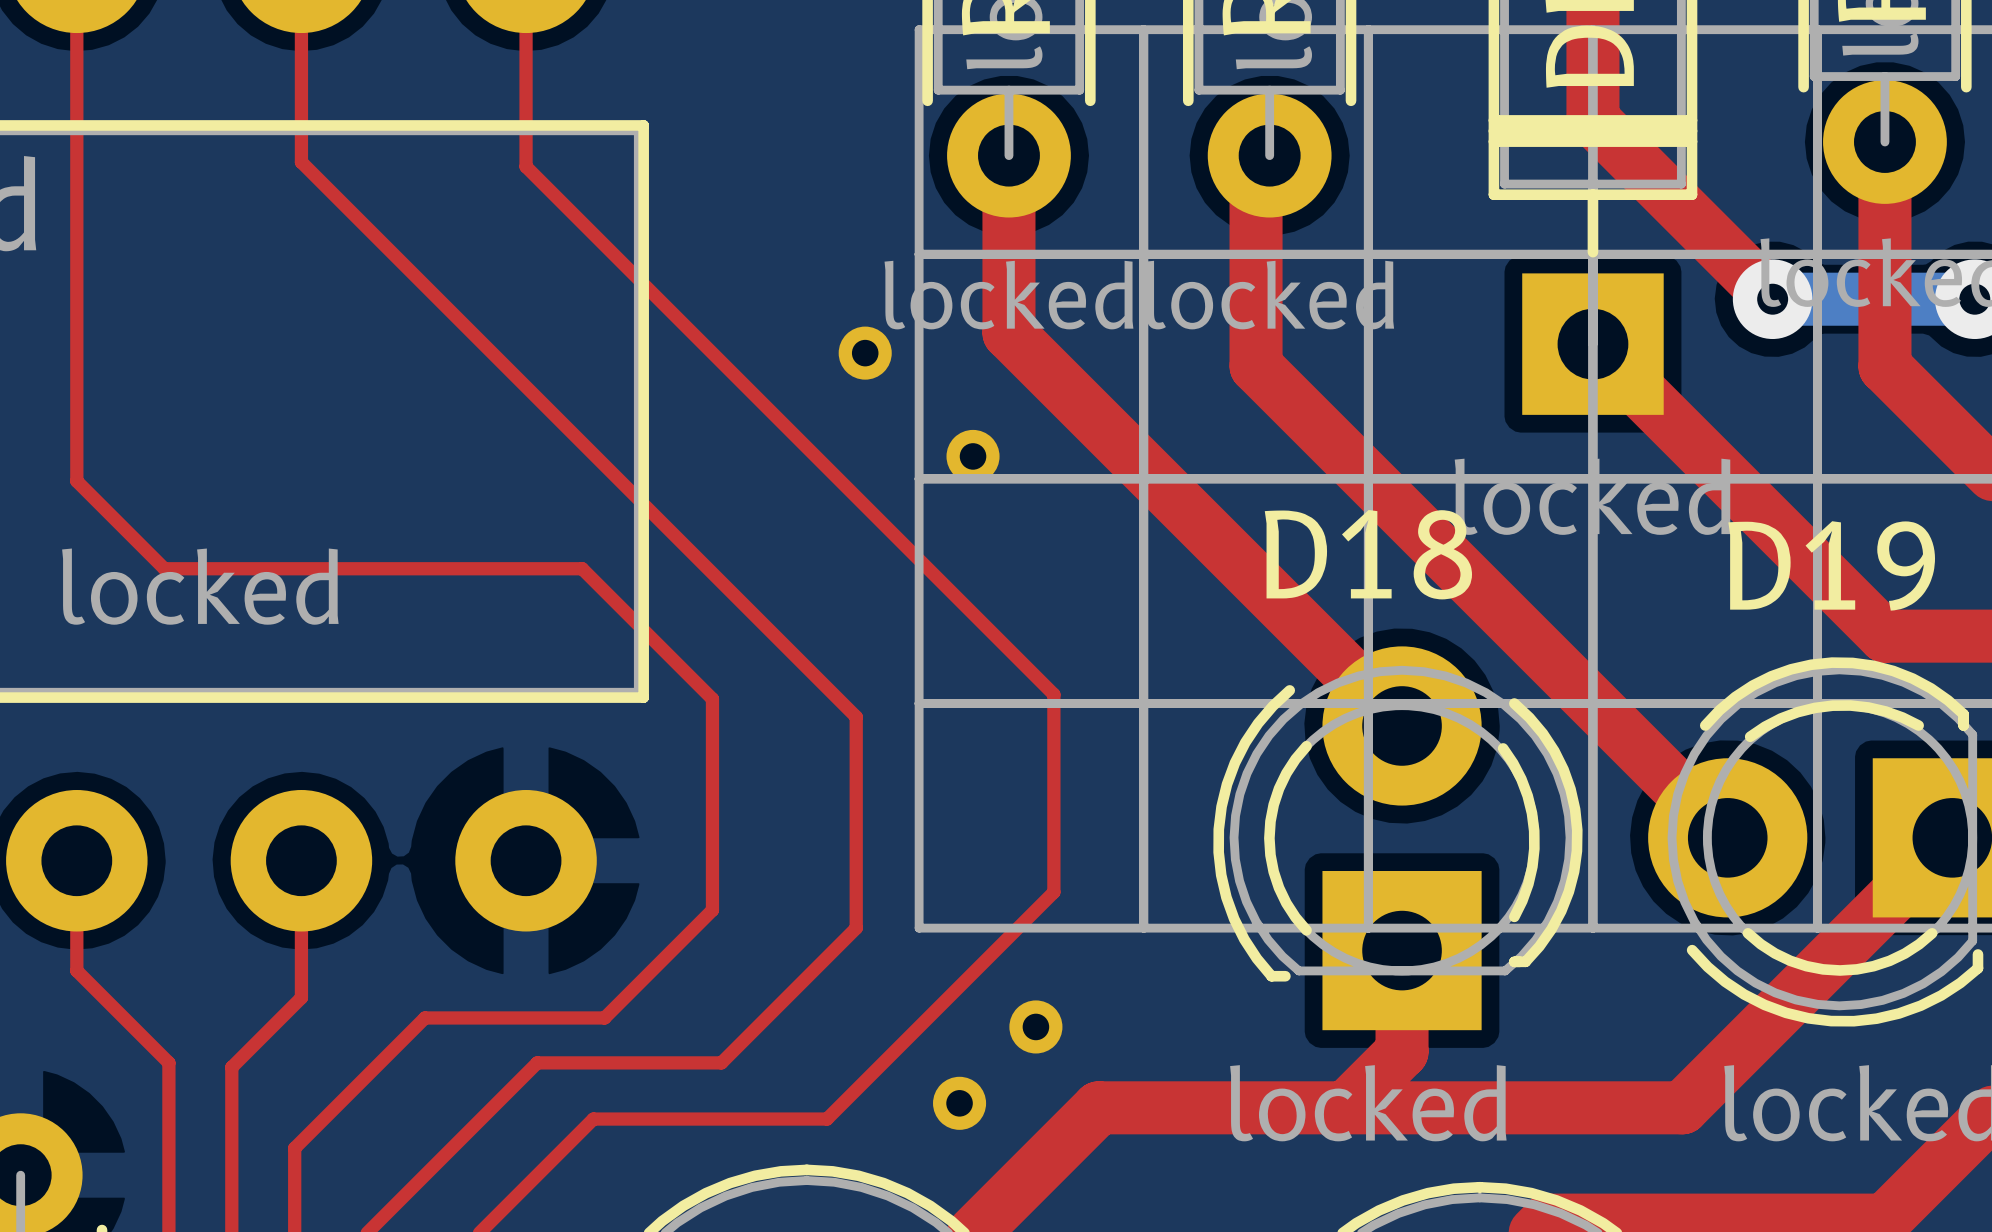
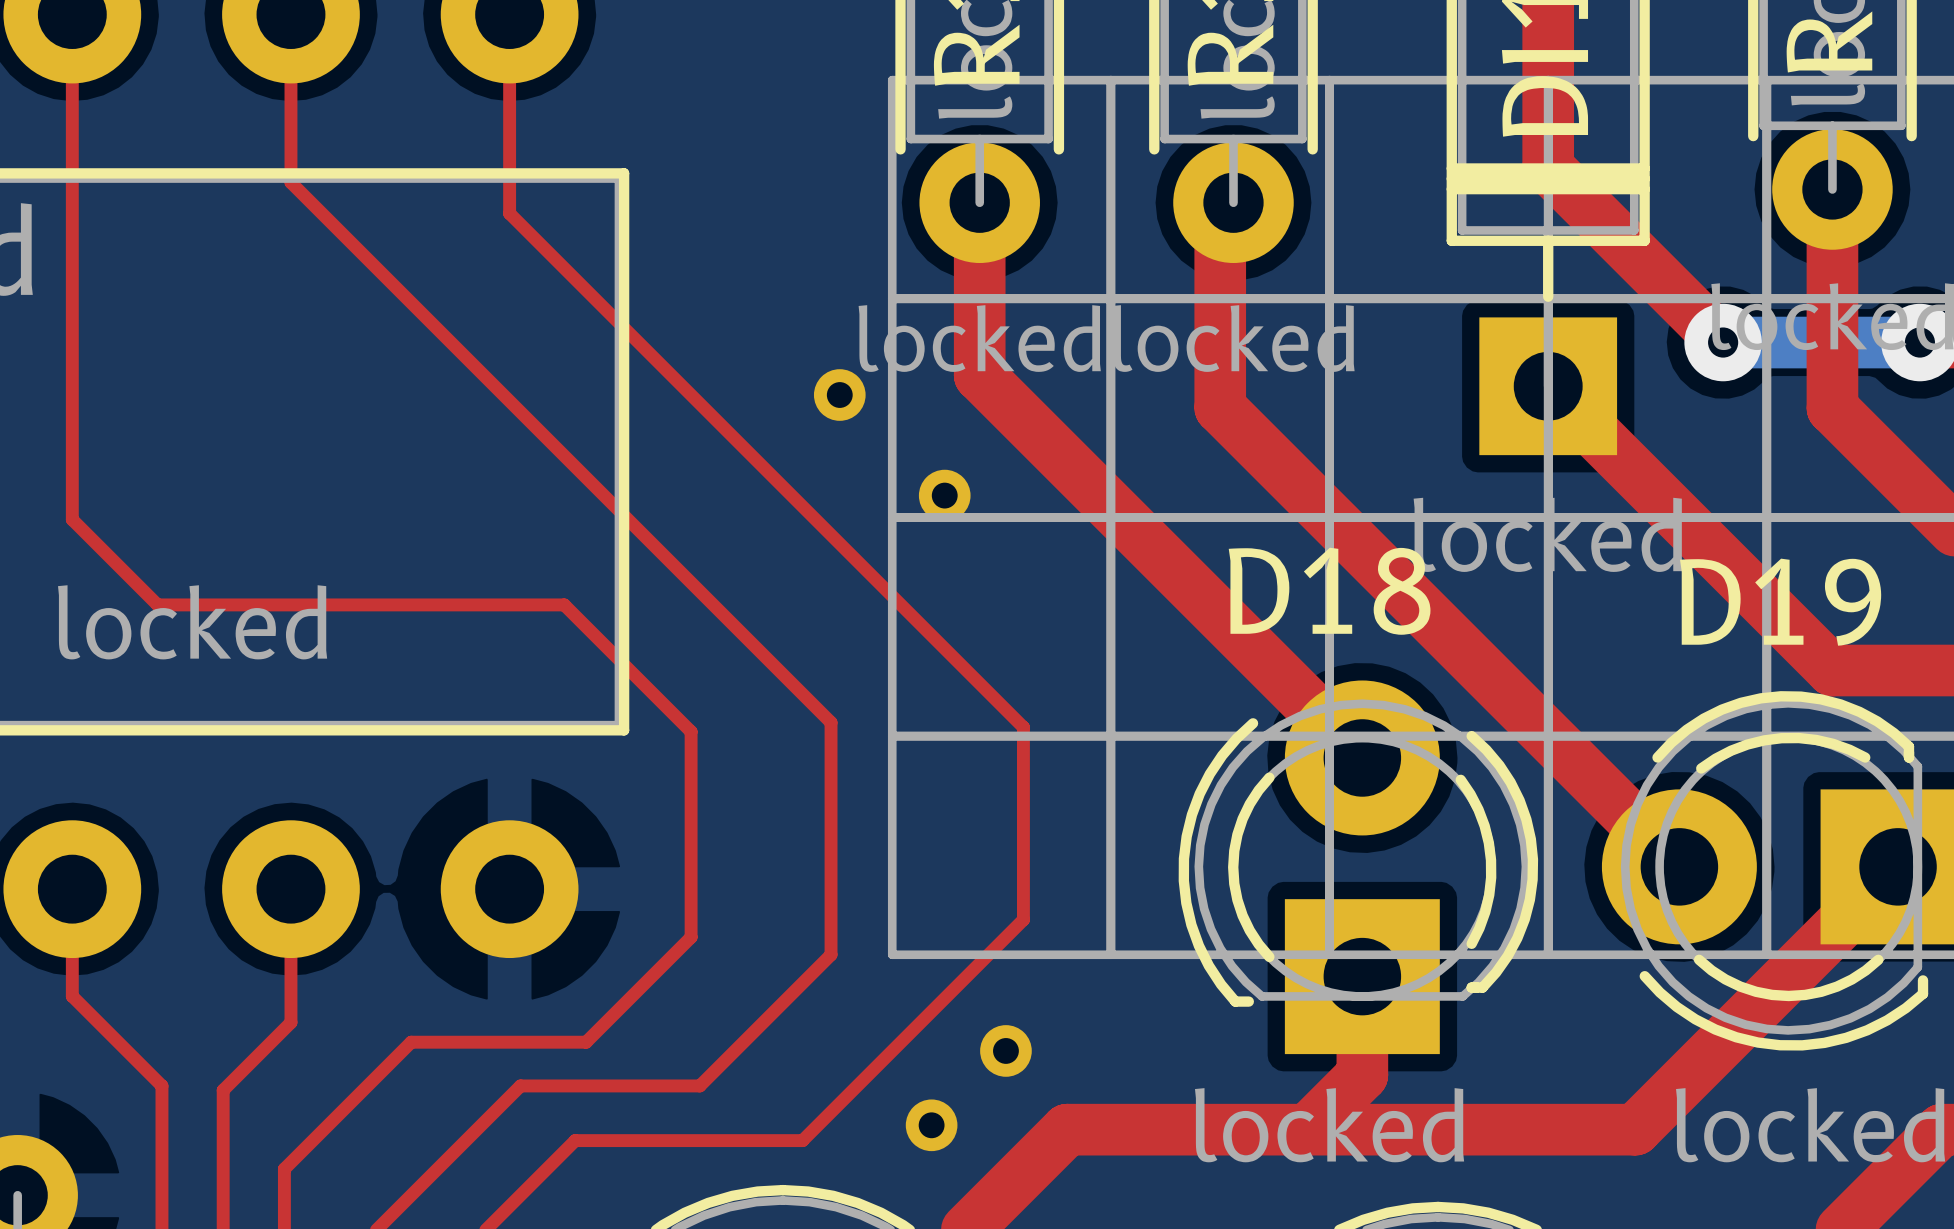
top track: (301, 134) (301, 162) (856, 716) -> (290, 182) (831, 722) (831, 749)

